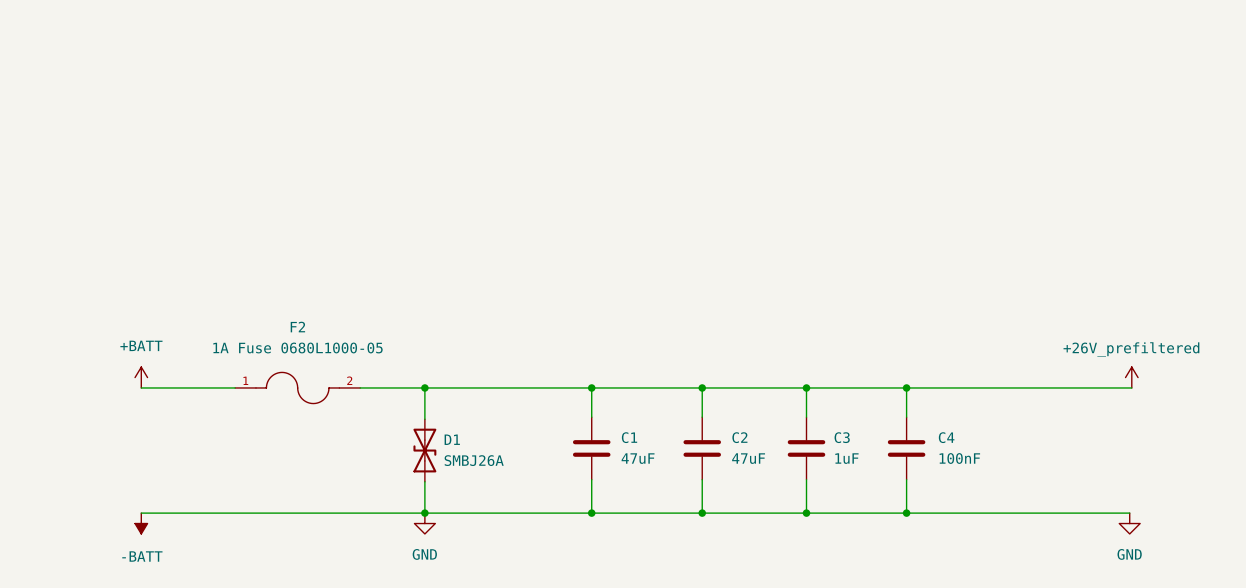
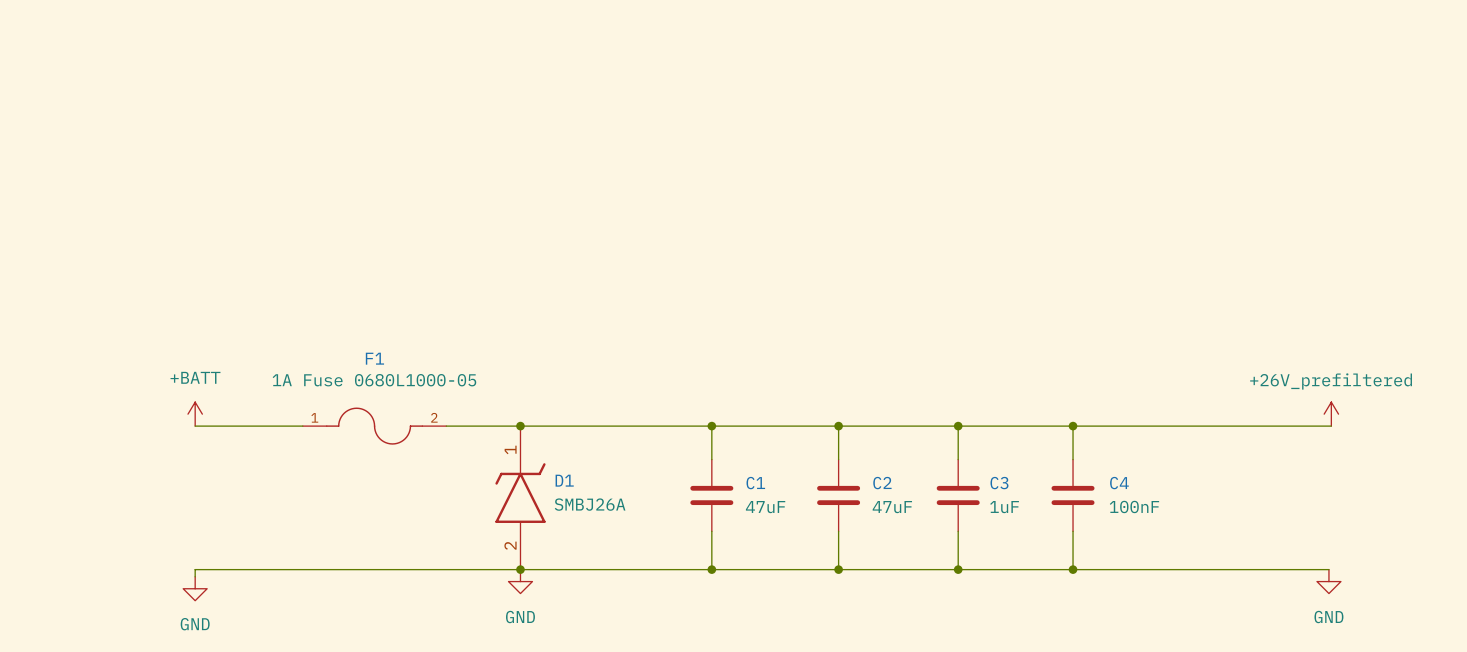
F2 name: F2 (297, 327) -> F1 (374, 358)
D1 symbol: [413, 419, 437, 482] -> [495, 426, 546, 570]
power symbol: -BATT (141, 523) -> GND (195, 588)

